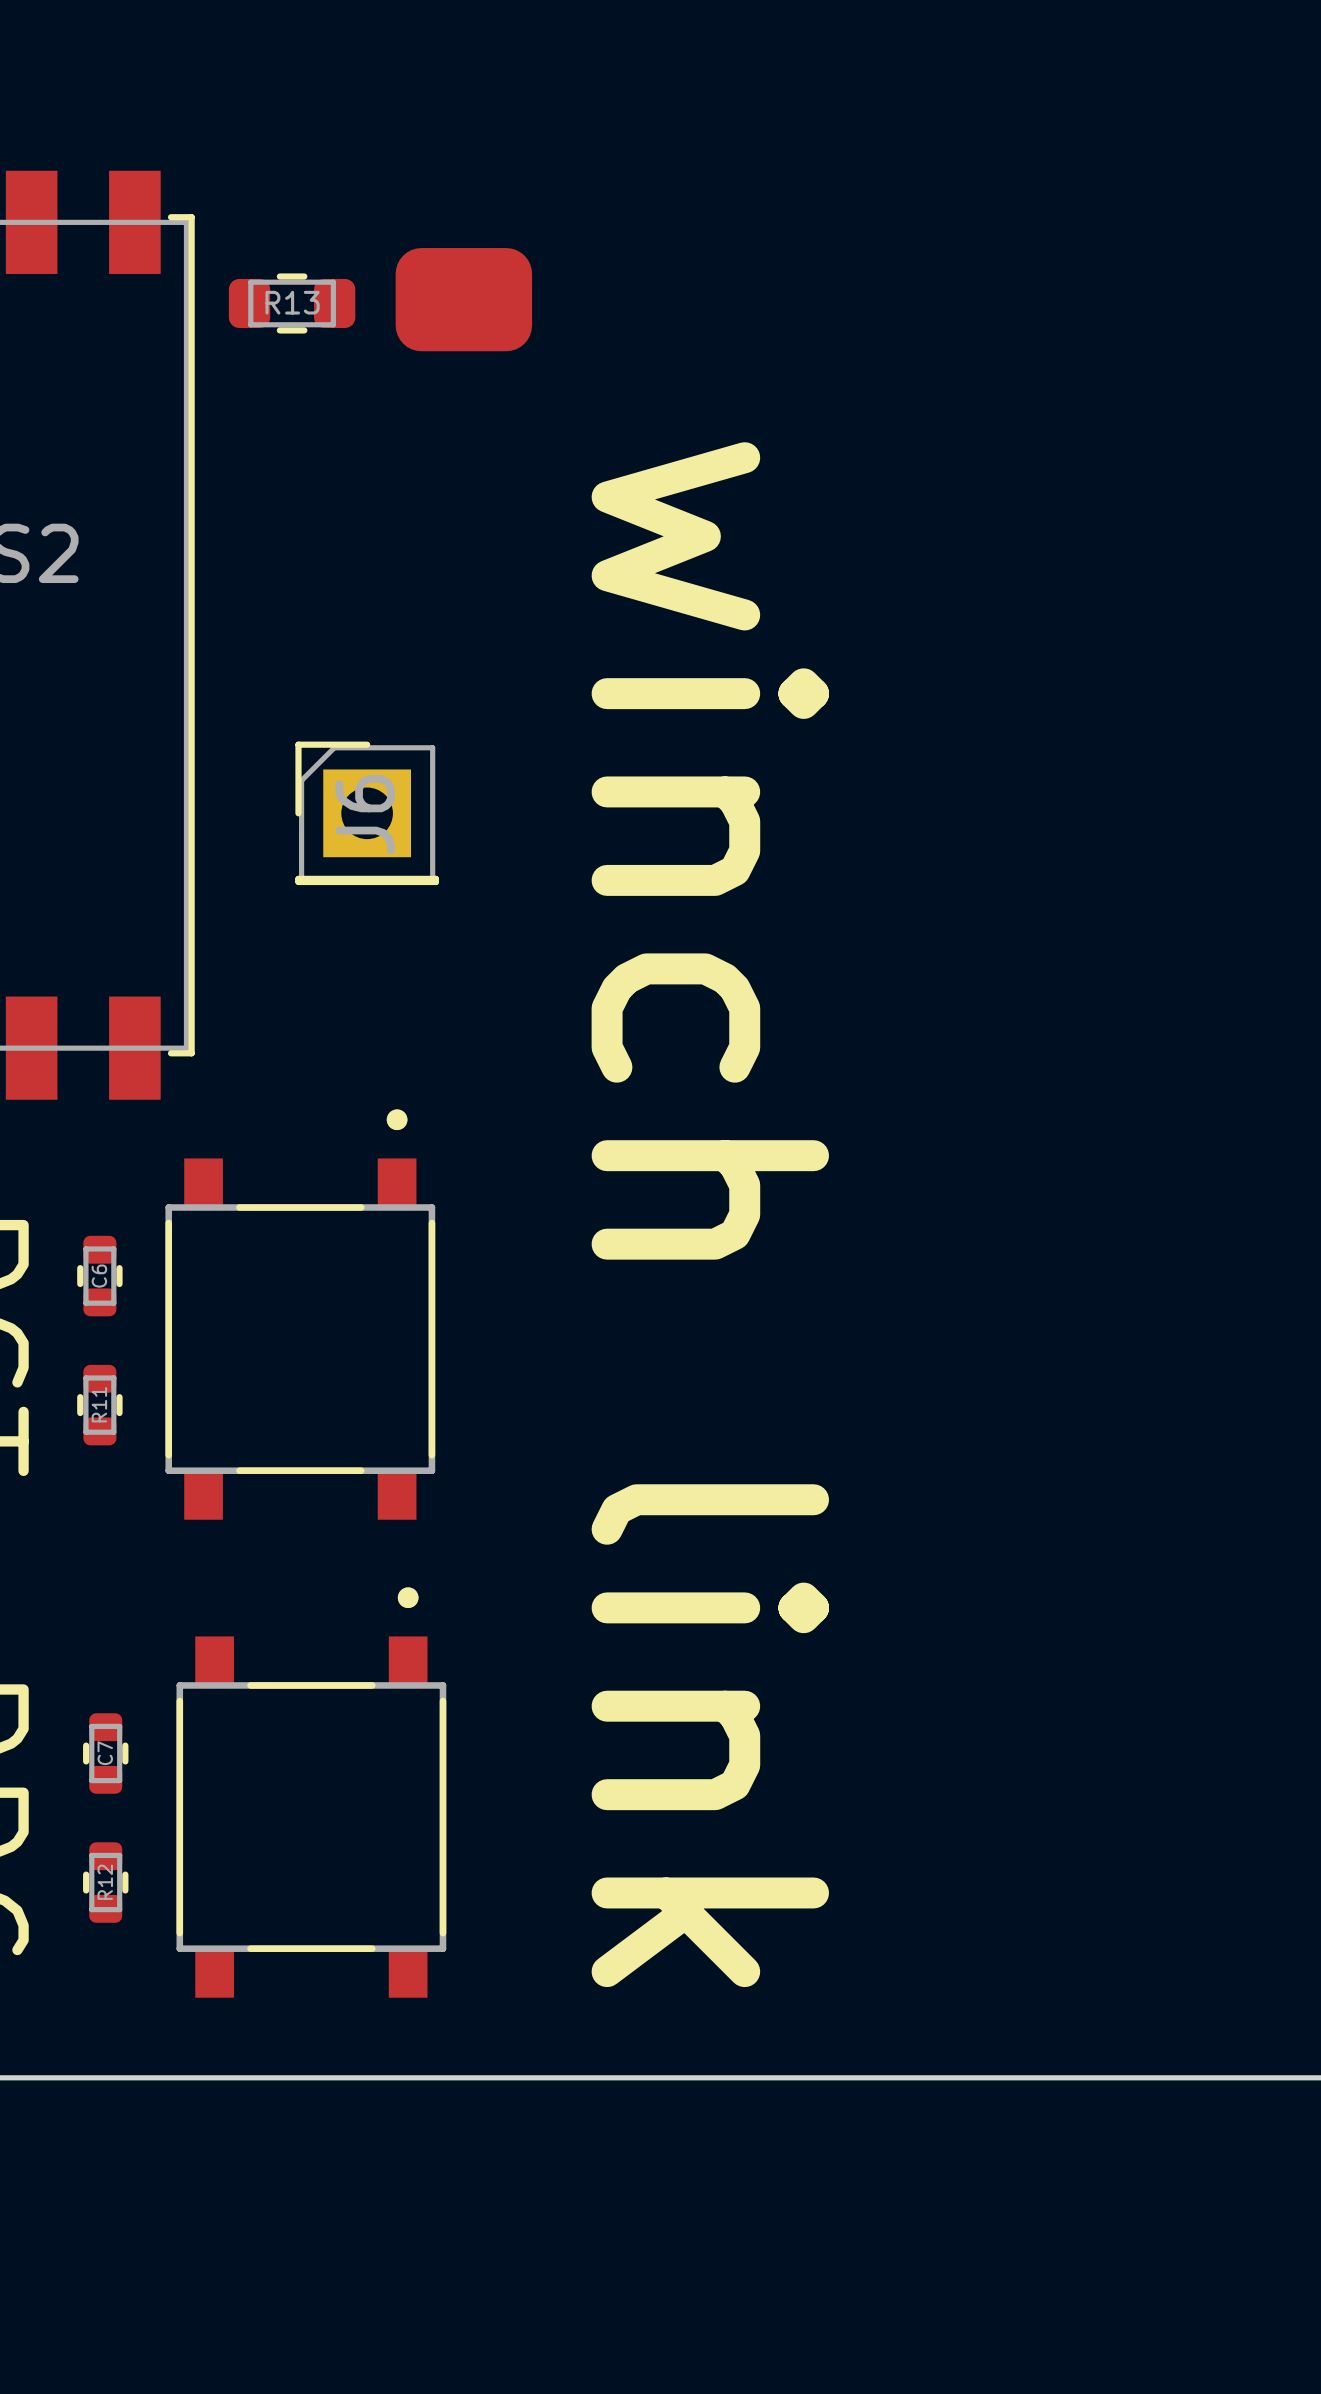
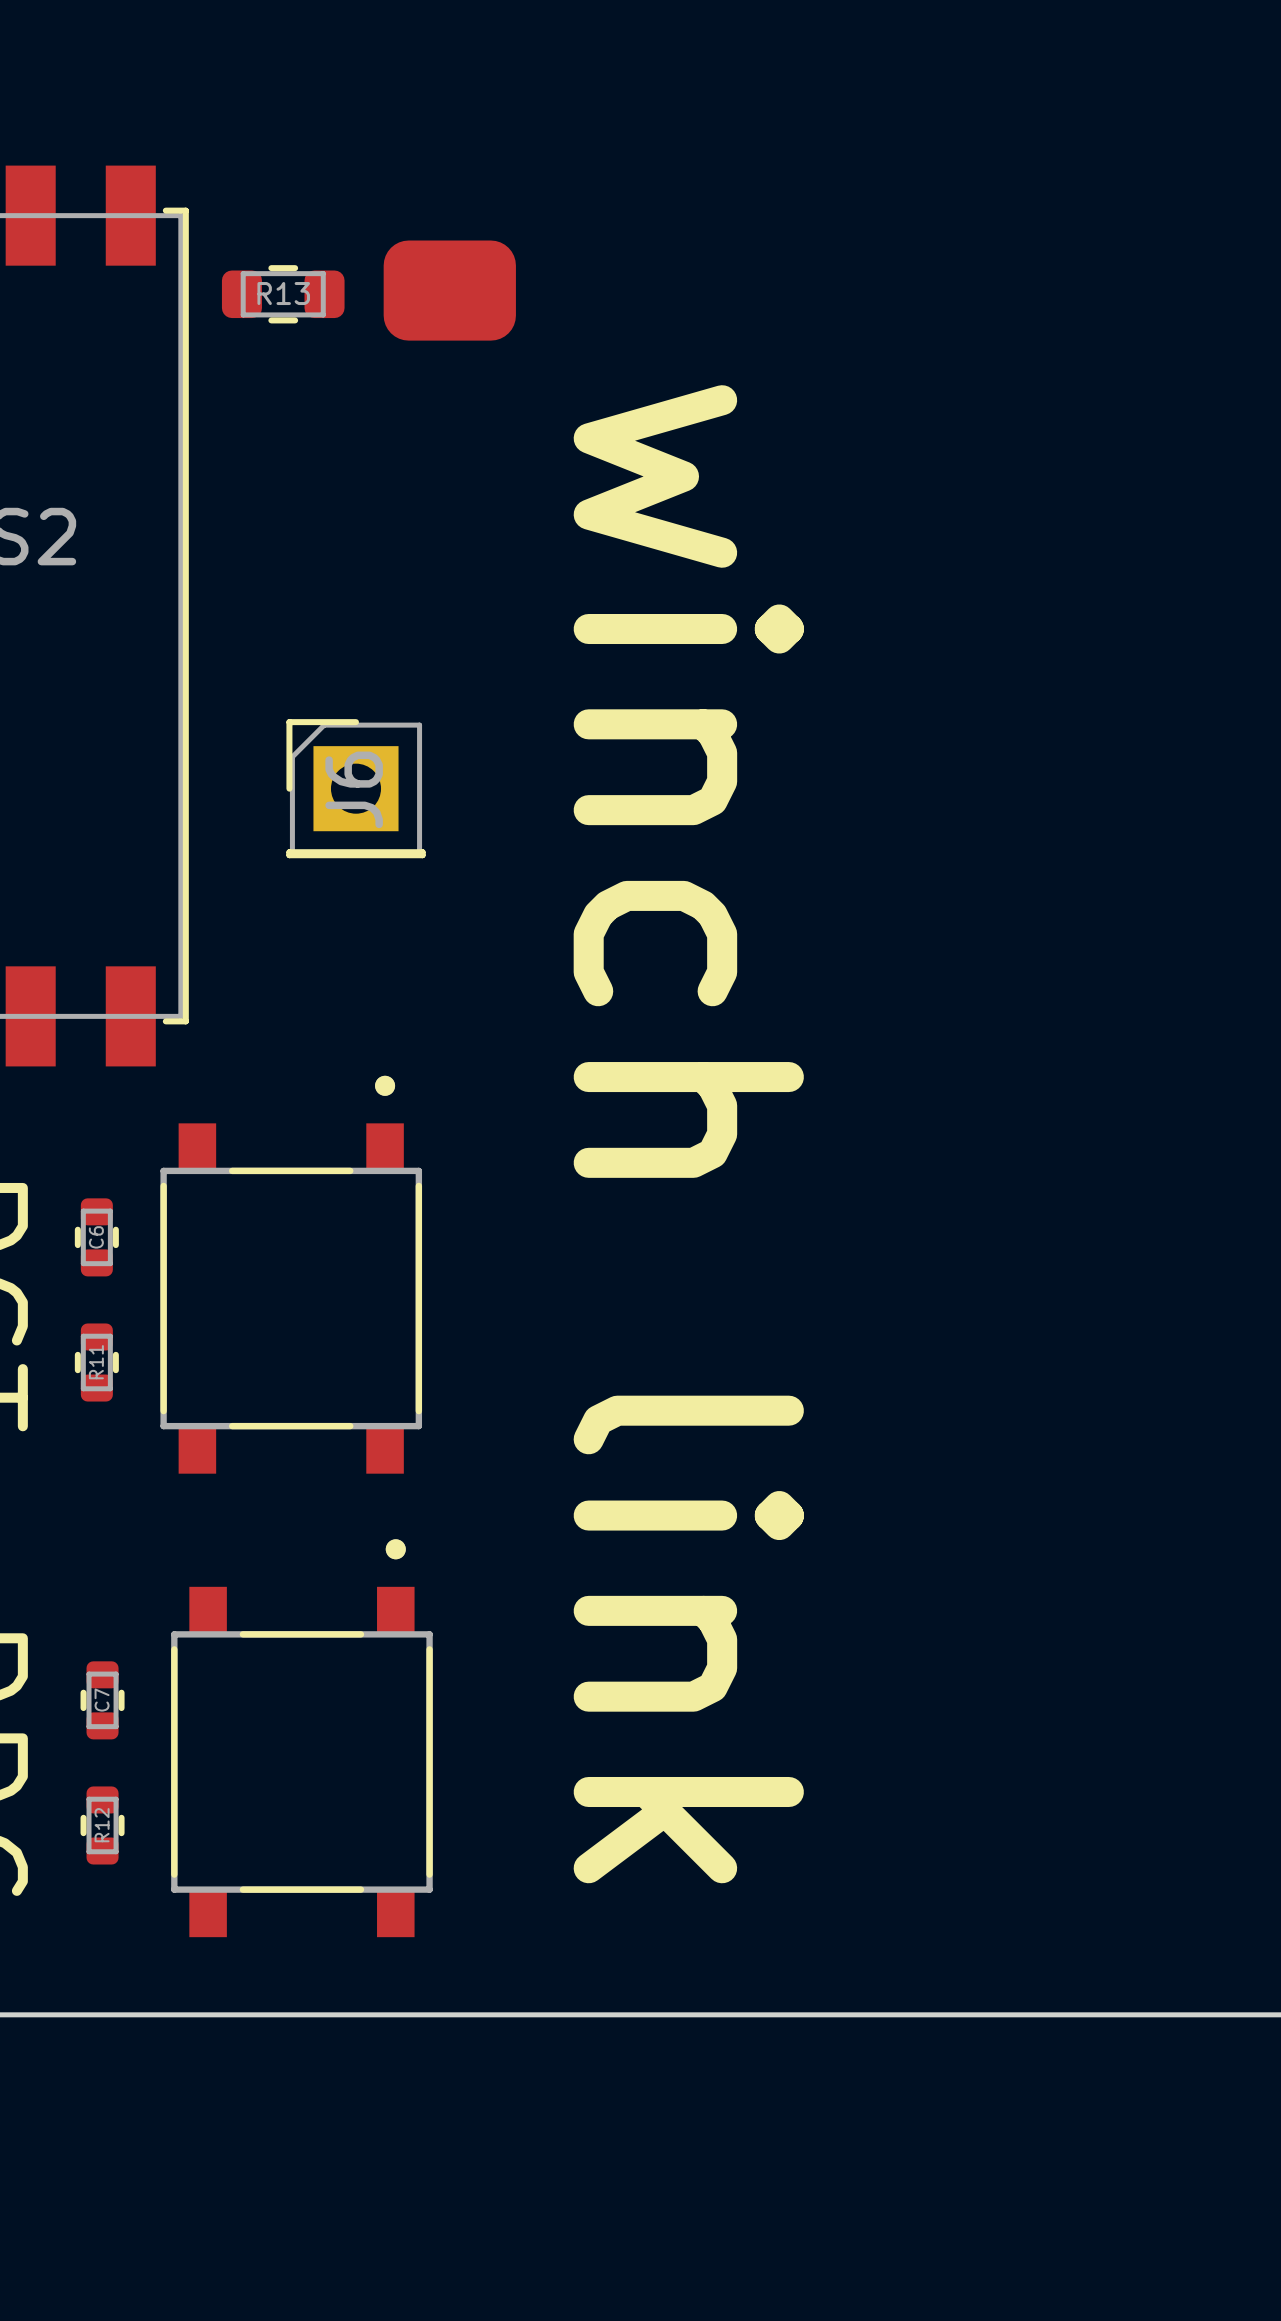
text position: winch link (710, 1214) -> winch link (688, 1134)

